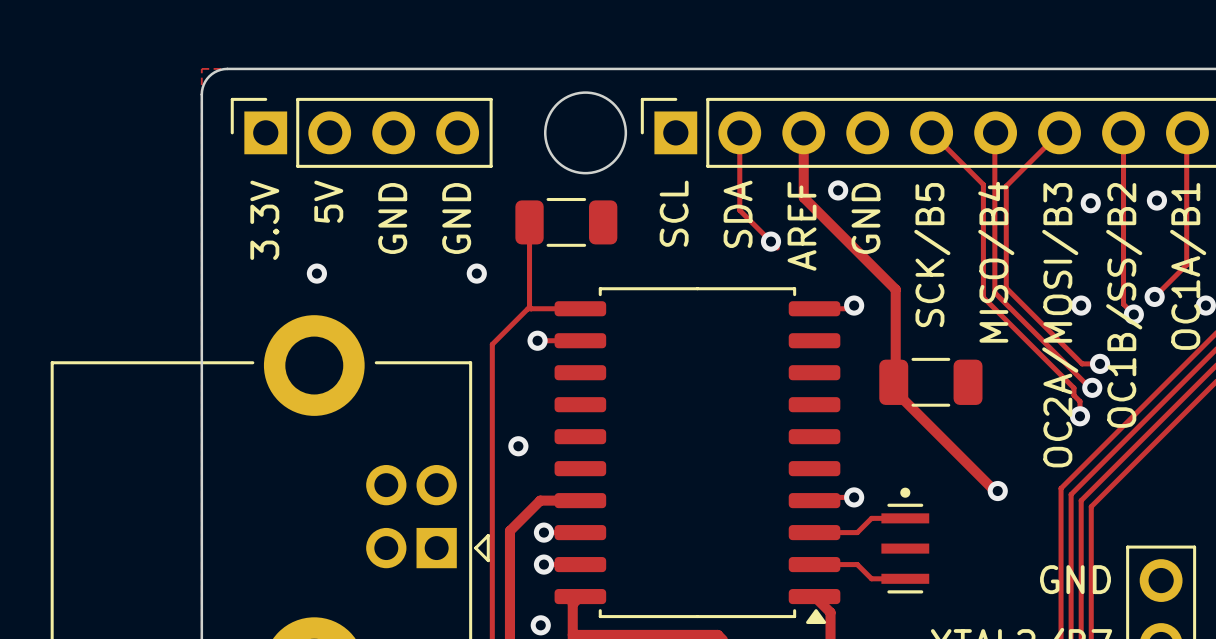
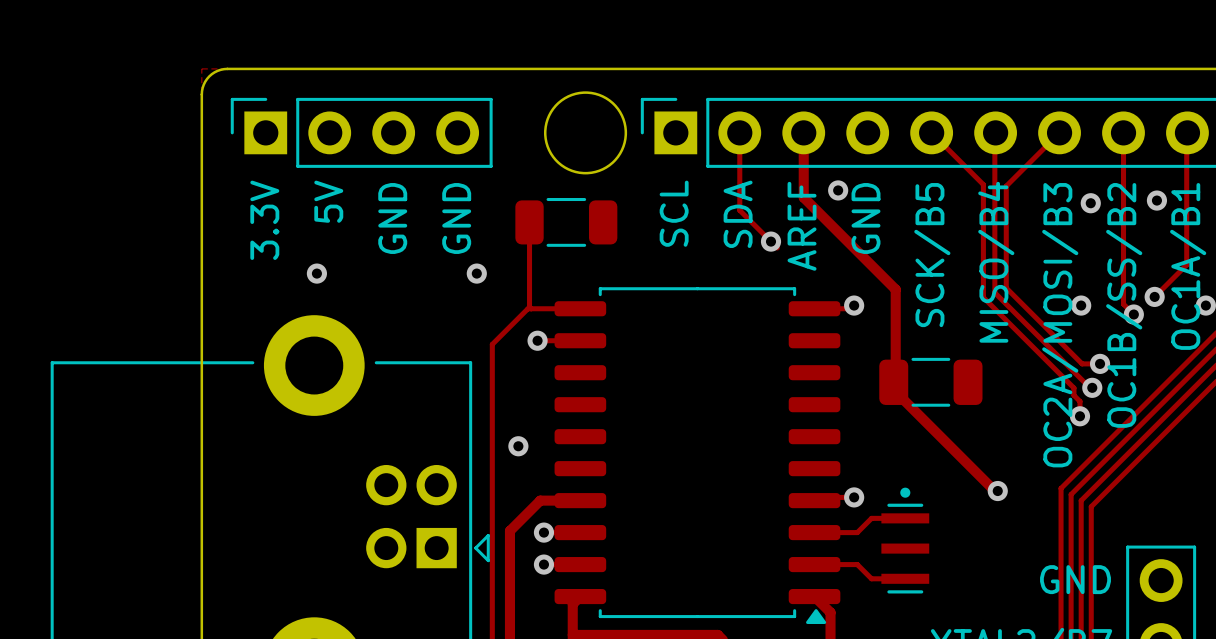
via: (540, 625) -> none

